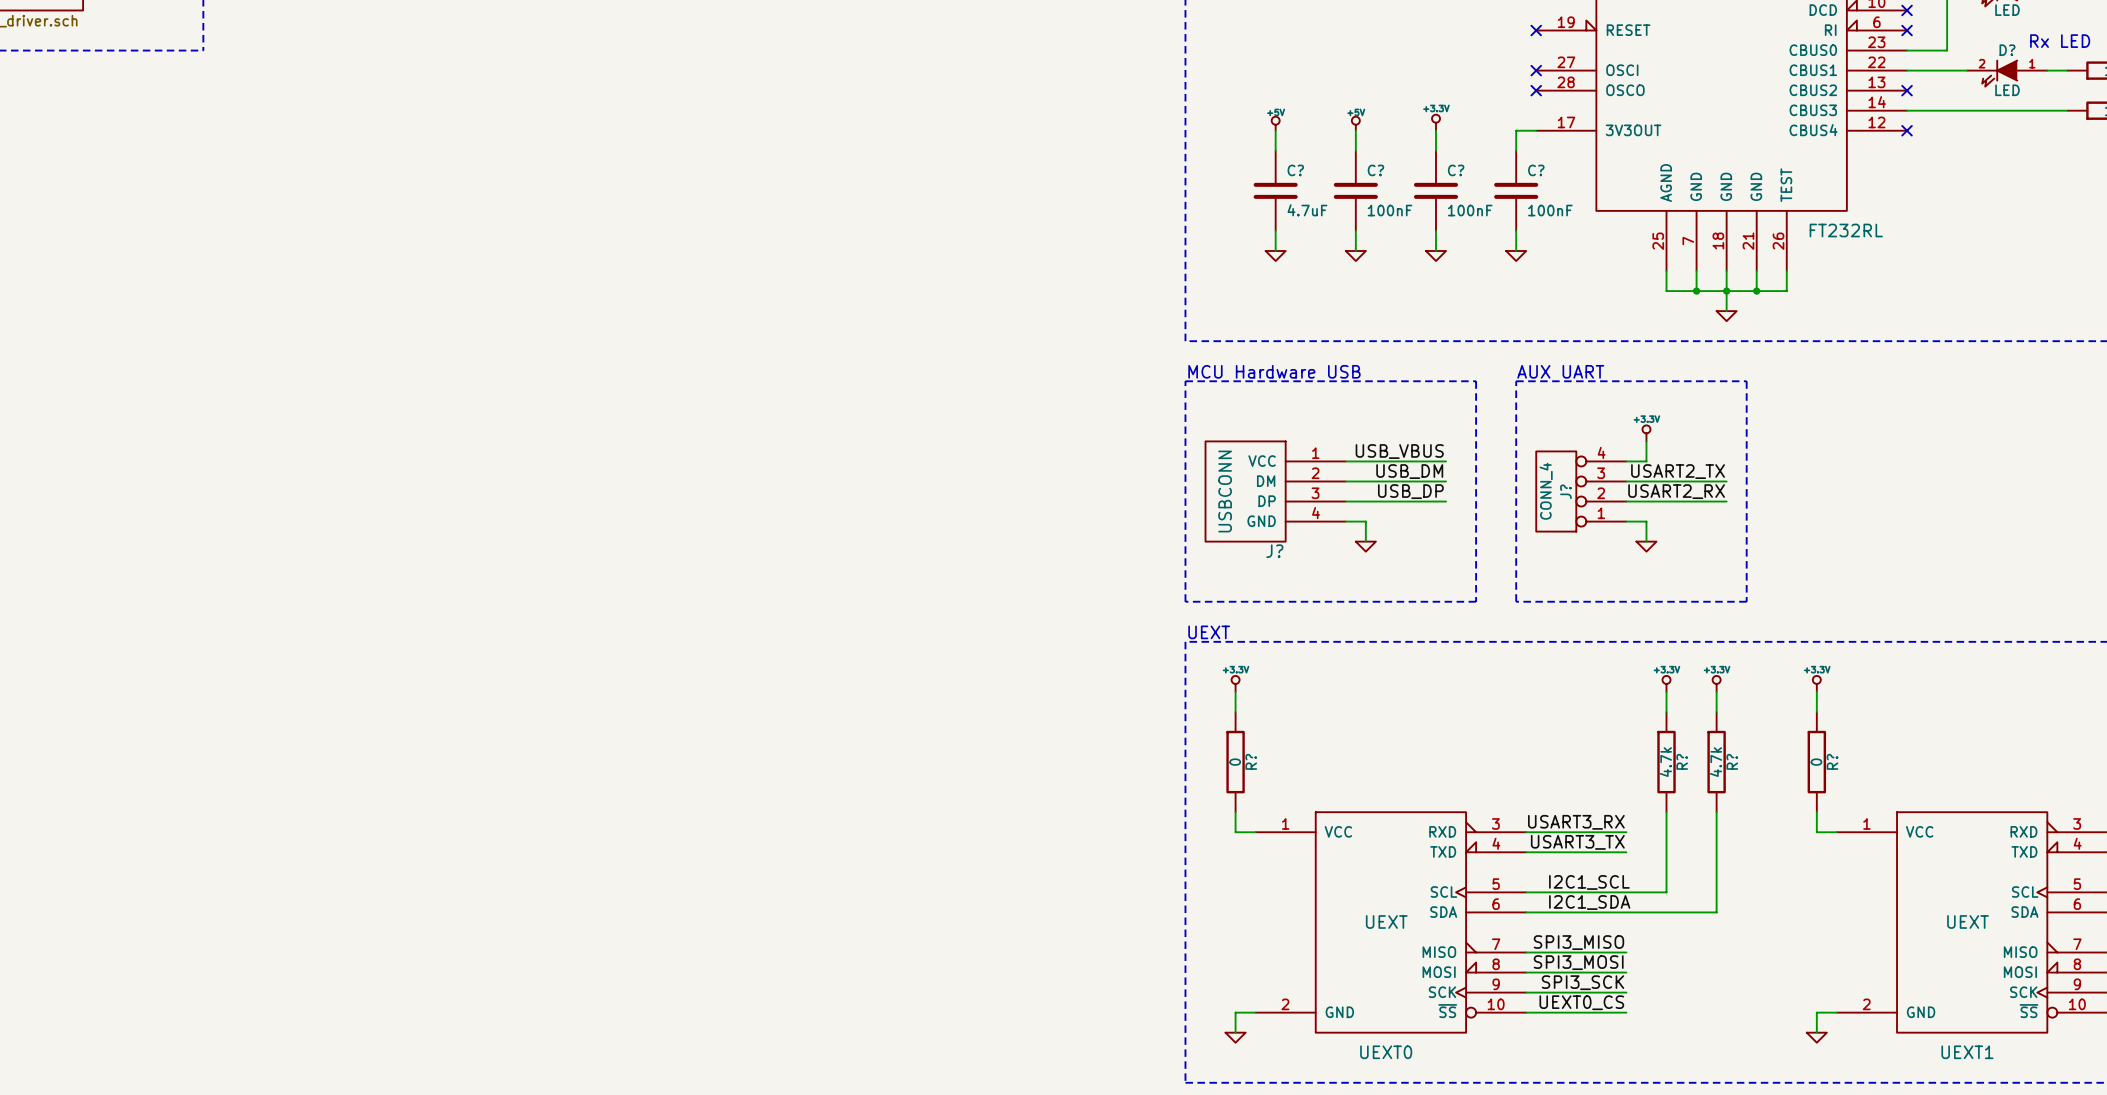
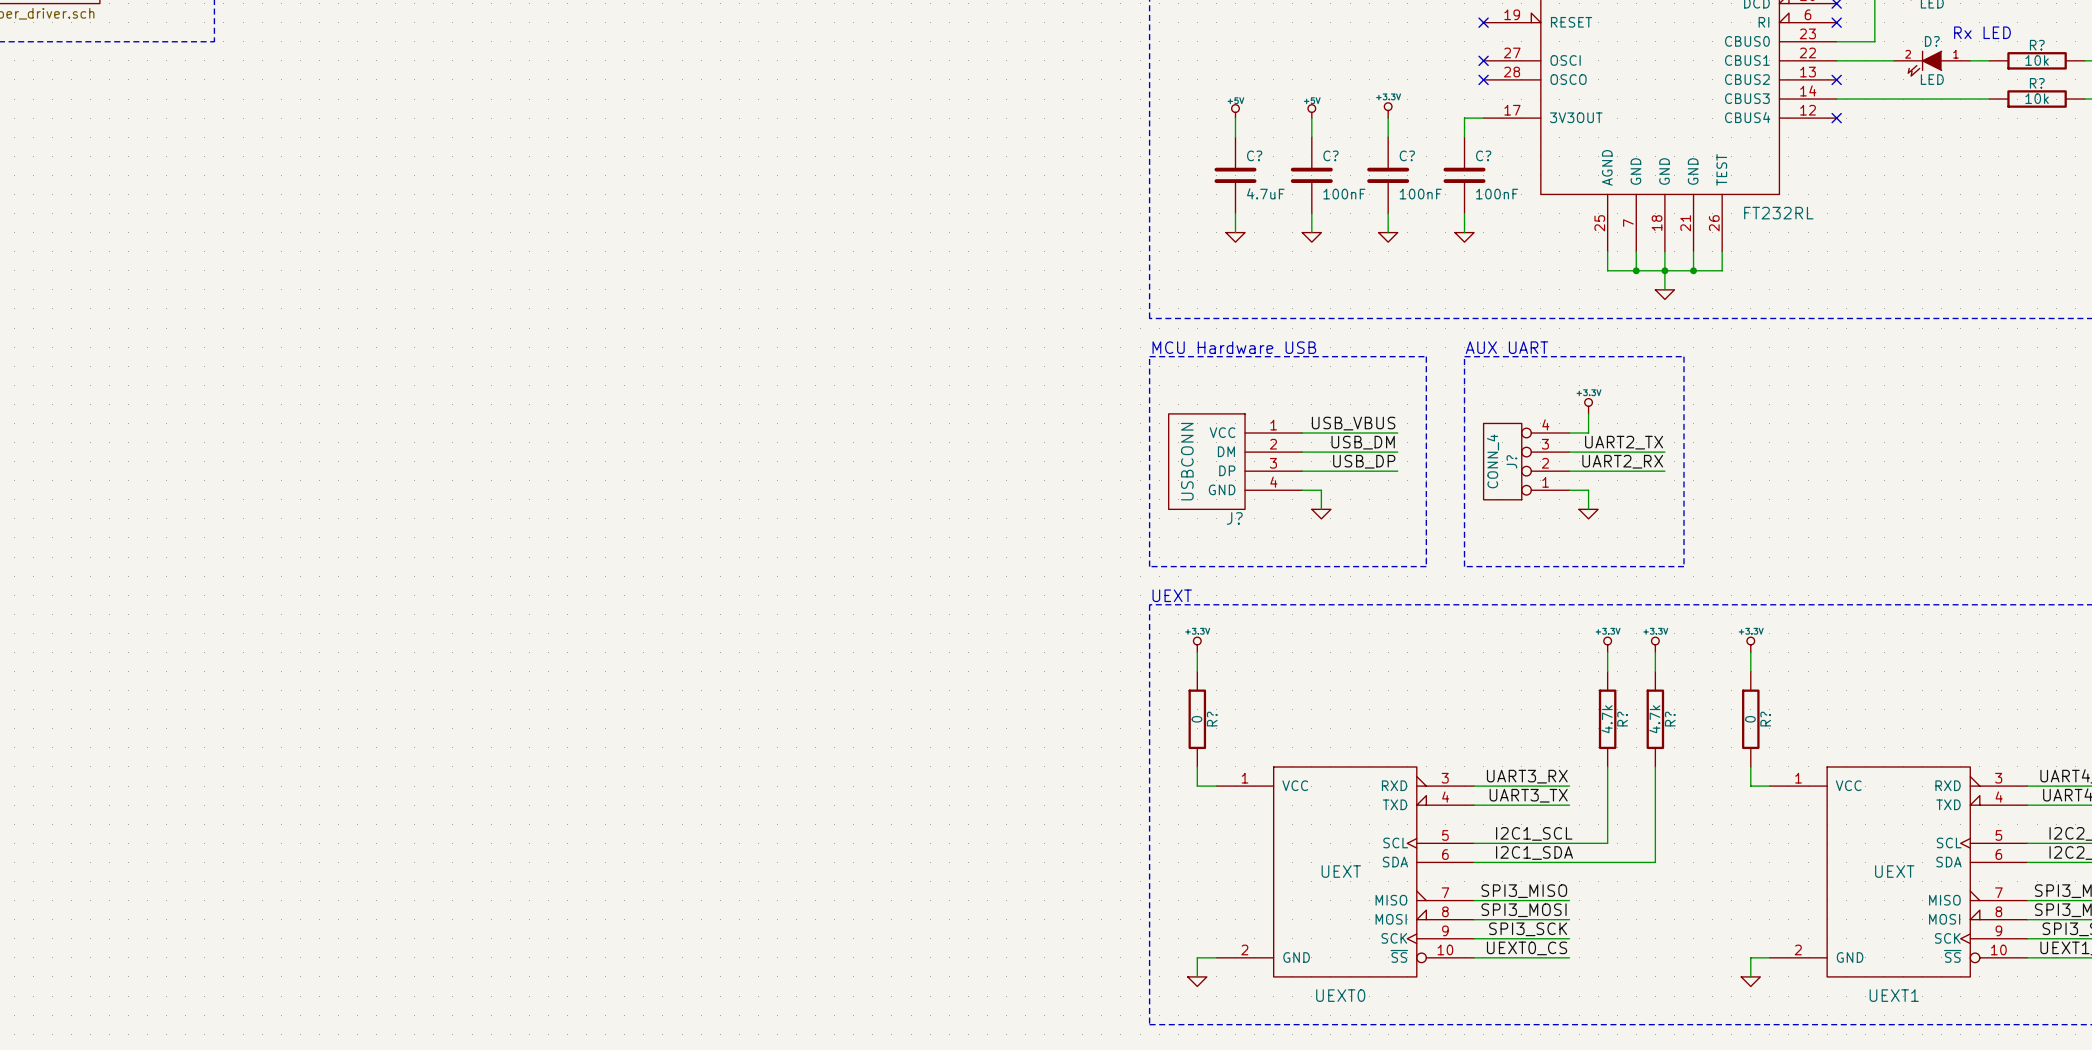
label: USART2_TX (1678, 471) -> UART2_TX (1624, 442)
label: USART2_RX (1676, 491) -> UART2_RX (1622, 461)
label: USART3_RX (1576, 822) -> UART3_RX (1527, 776)
label: USART3_TX (1577, 842) -> UART3_TX (1528, 795)

